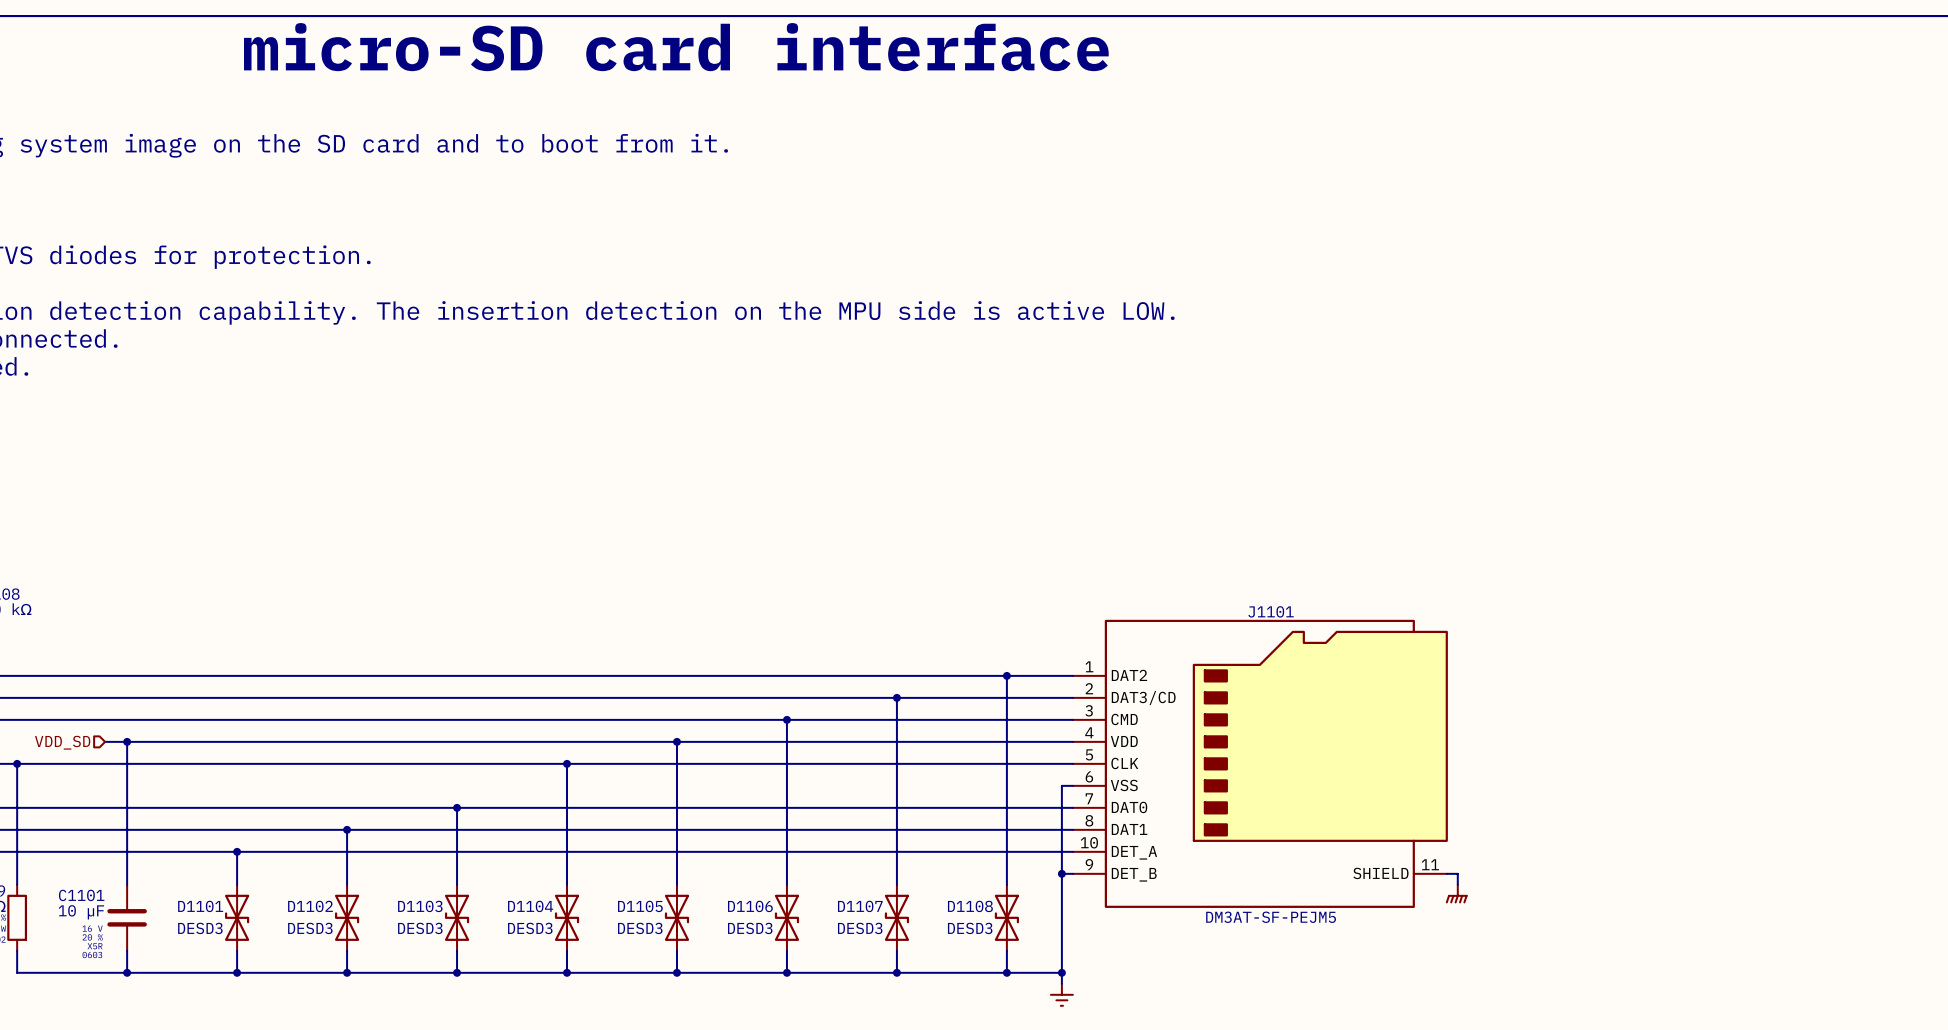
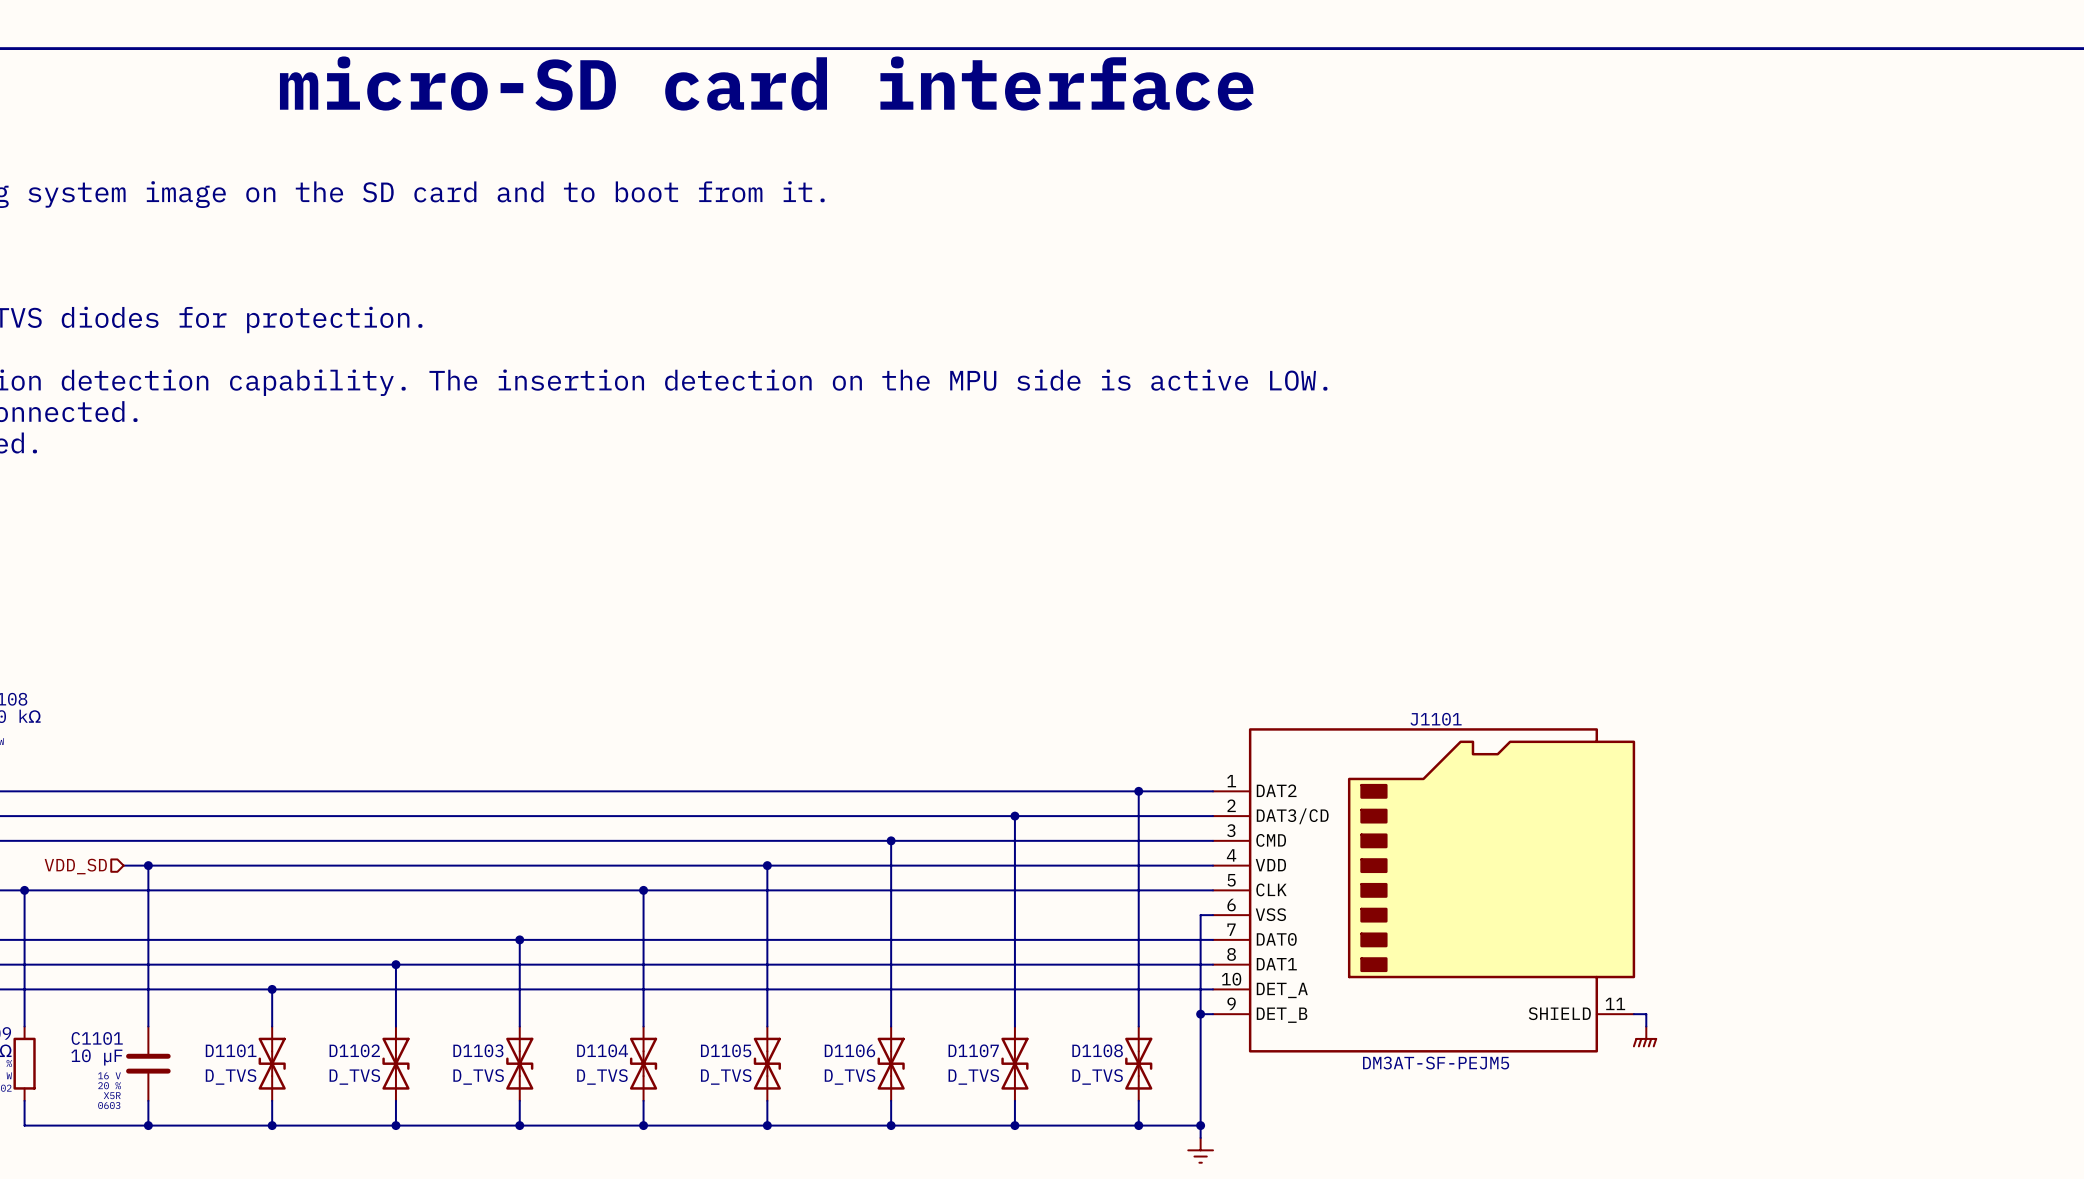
D1101 value: DESD3 (200, 928) -> D_TVS (231, 1076)
D1102 value: DESD3 (310, 928) -> D_TVS (354, 1076)
D1103 value: DESD3 (420, 928) -> D_TVS (478, 1076)
D1104 value: DESD3 (530, 928) -> D_TVS (602, 1076)
D1105 value: DESD3 (640, 928) -> D_TVS (726, 1076)
D1106 value: DESD3 (750, 928) -> D_TVS (850, 1076)
D1107 value: DESD3 (860, 928) -> D_TVS (973, 1076)
D1108 value: DESD3 (970, 928) -> D_TVS (1097, 1076)

